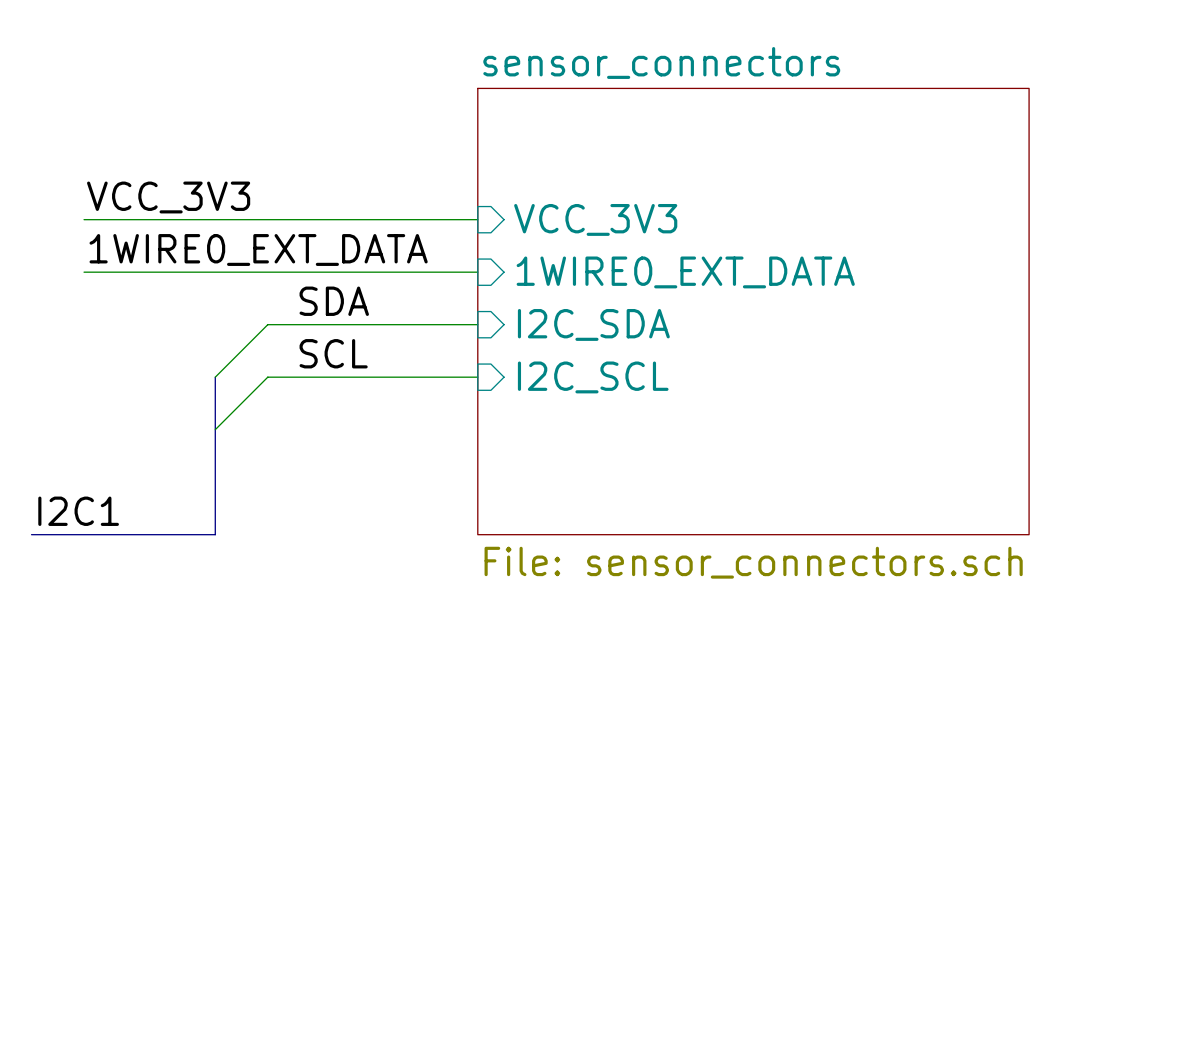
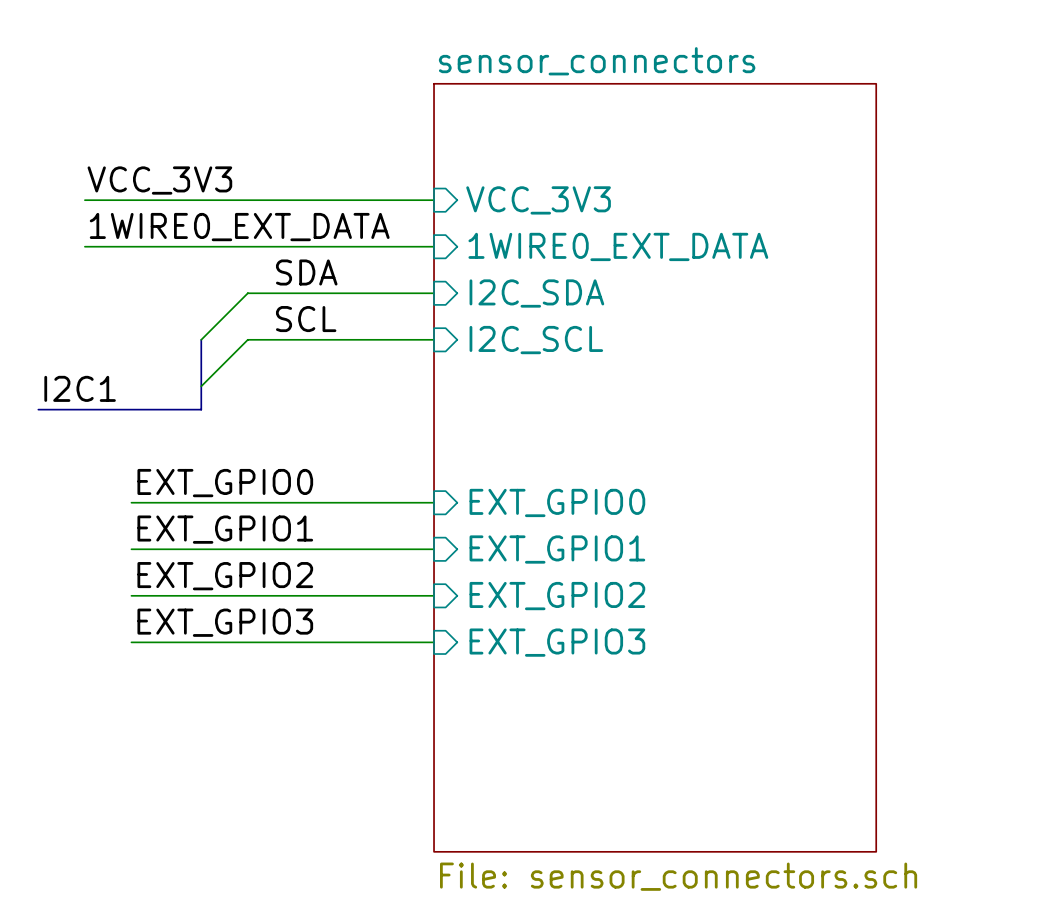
sheet sensor_connectors: File: sensor_connectors.sch (753, 311) -> none
bus: (215, 455) (215, 534) (31, 534) -> (201, 409) (38, 409)
label position: I2C1 (78, 511) -> I2C1 (80, 388)
sheet sensor_connectors: none -> File: sensor_connectors.sch (655, 467)
label: none -> EXT_GPIO0 (225, 483)
wire: none -> (131, 502) (434, 502)
sheet pin: none -> EXT_GPIO0 (557, 502)
label: none -> EXT_GPIO1 (225, 529)
wire: none -> (131, 549) (434, 549)
sheet pin: none -> EXT_GPIO1 (557, 549)
label: none -> EXT_GPIO2 (225, 576)
wire: none -> (131, 595) (434, 595)
sheet pin: none -> EXT_GPIO2 (557, 596)
label: none -> EXT_GPIO3 (225, 622)
wire: none -> (131, 642) (434, 642)
sheet pin: none -> EXT_GPIO3 (557, 642)

